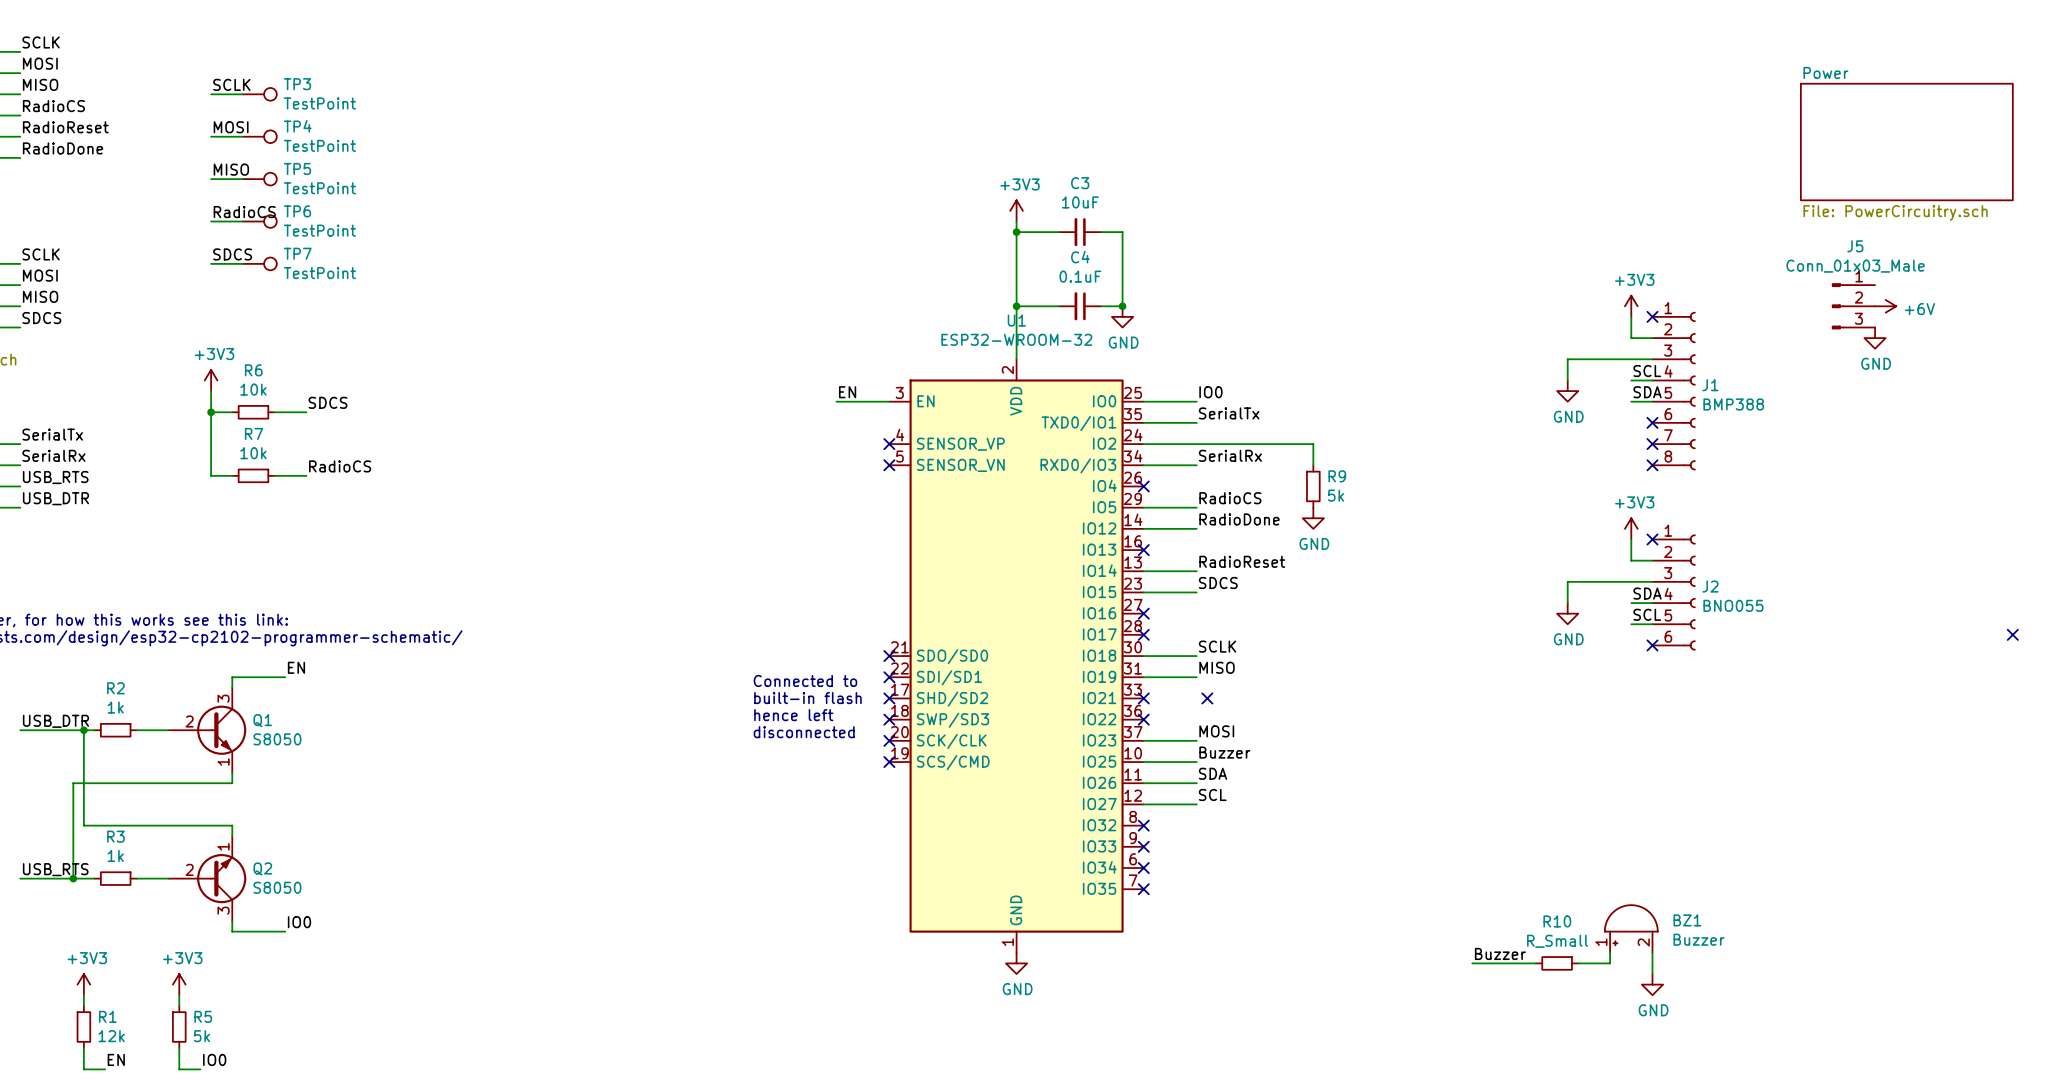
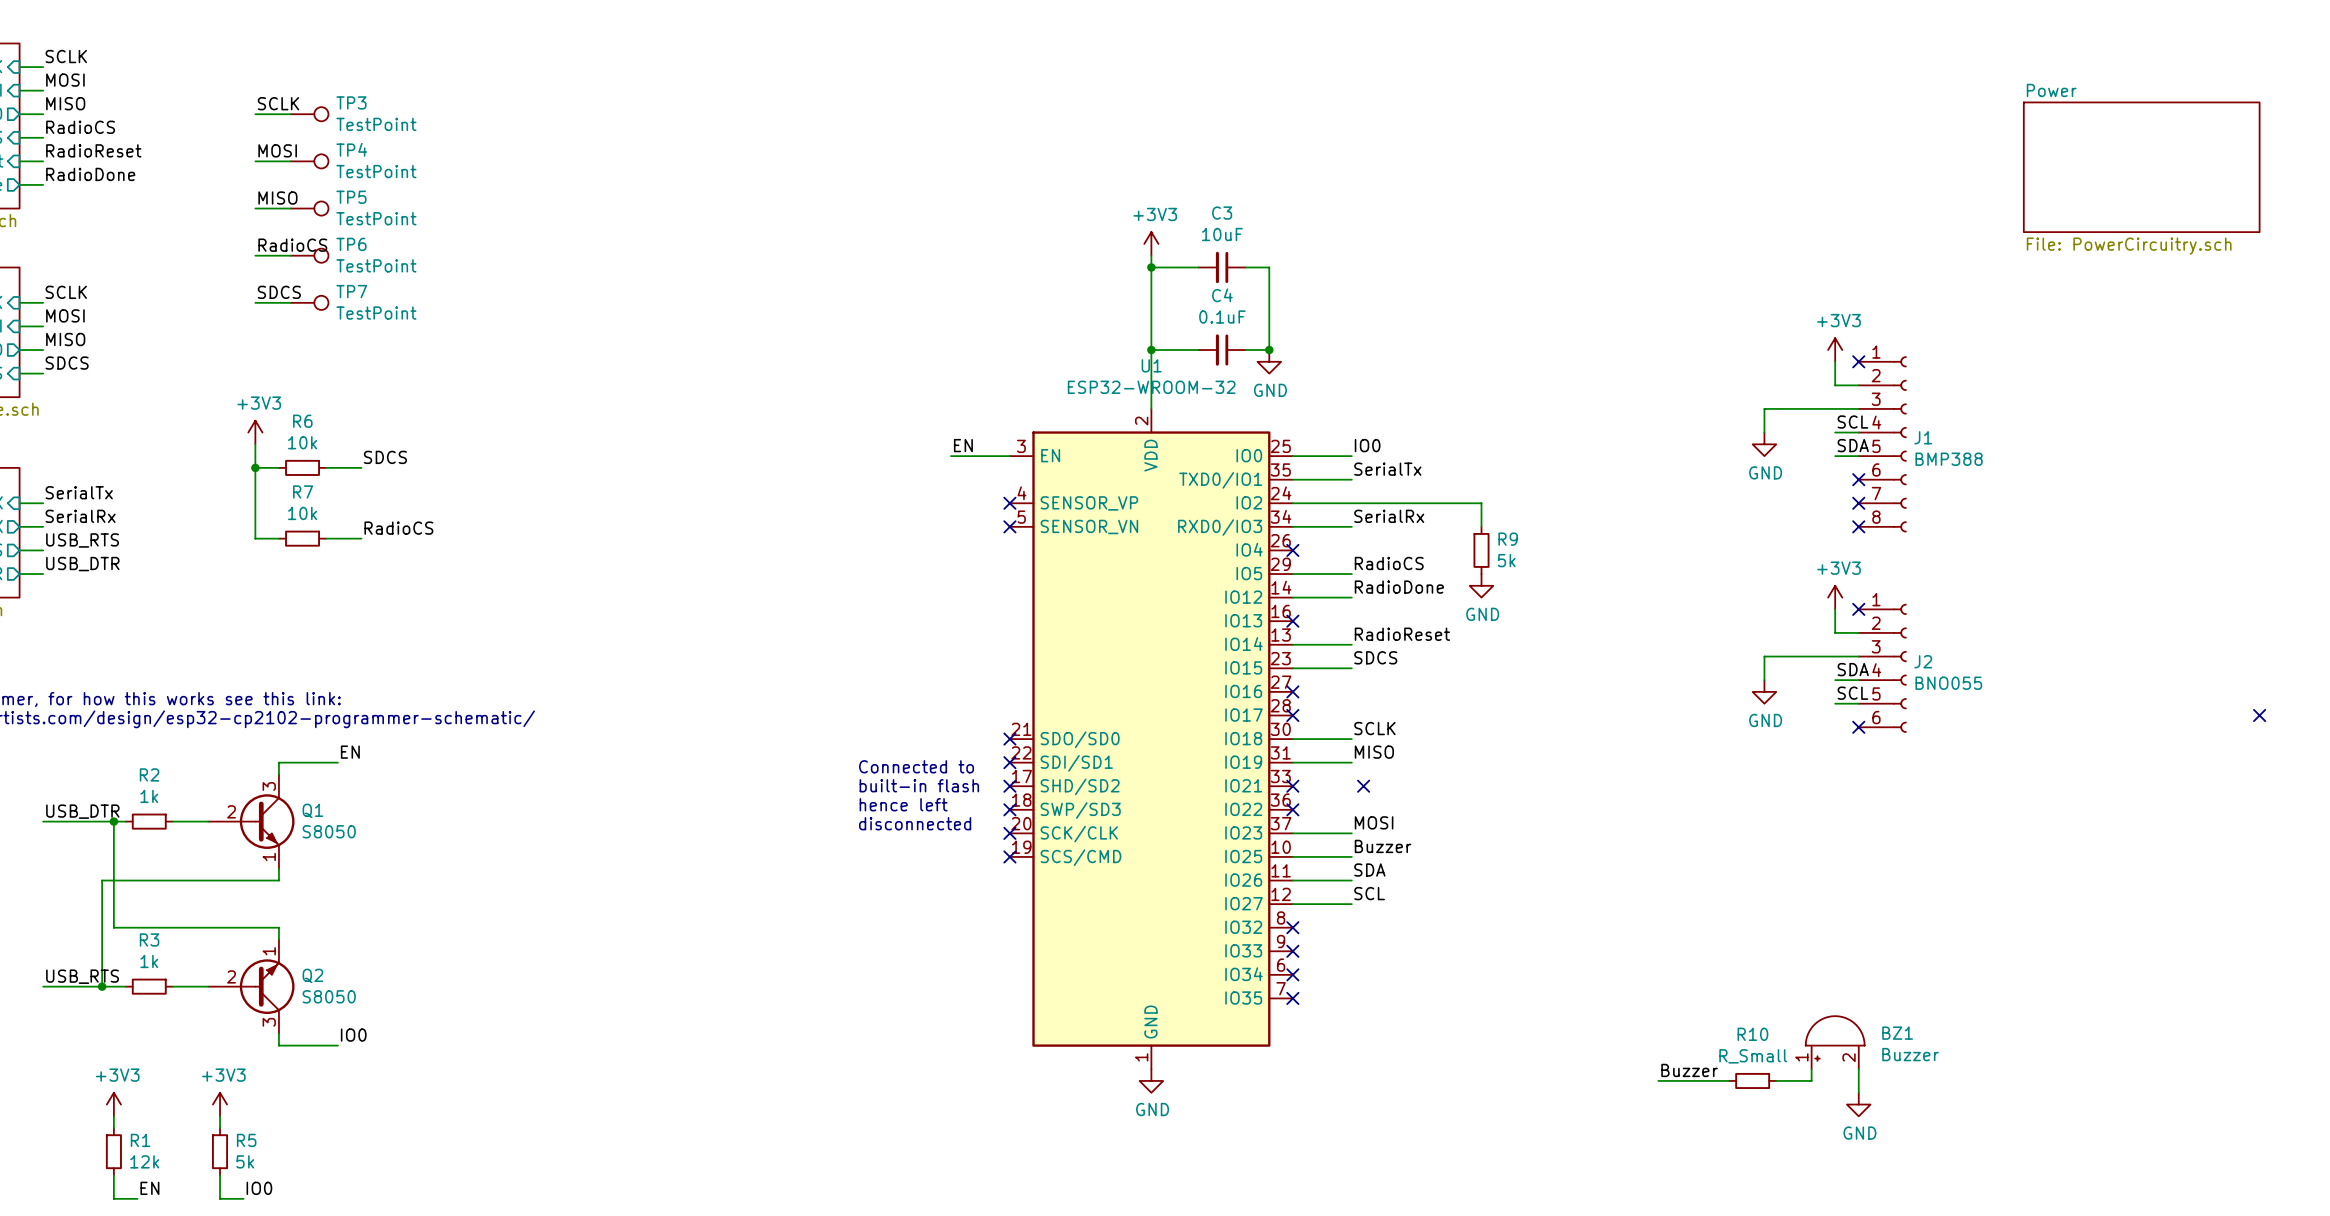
J5: Conn_01x03_Male (1853, 306) -> none
power symbol: +6V (1885, 306) -> none
power symbol: GND (1875, 338) -> none

